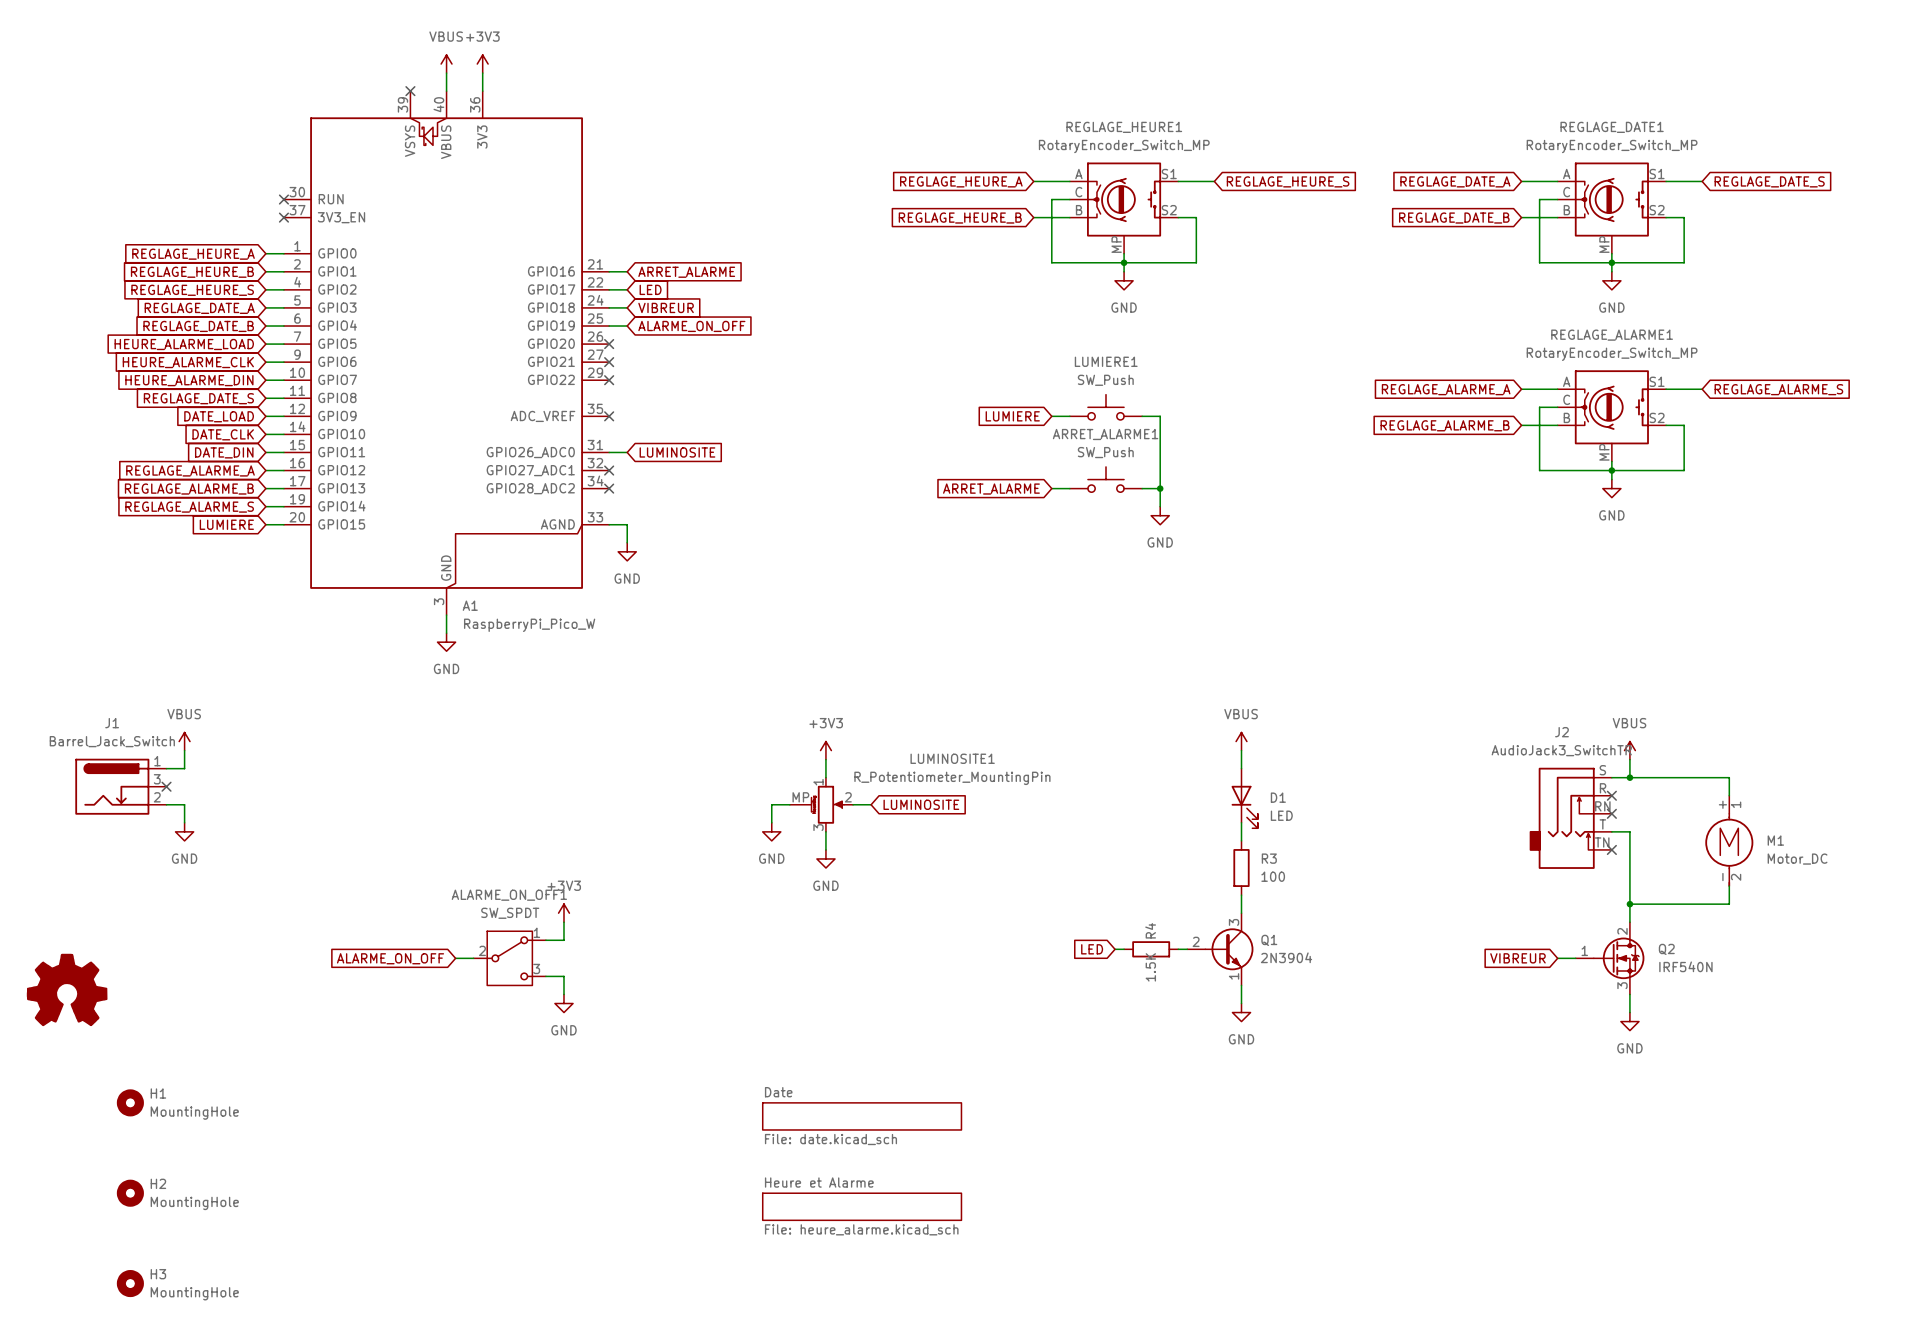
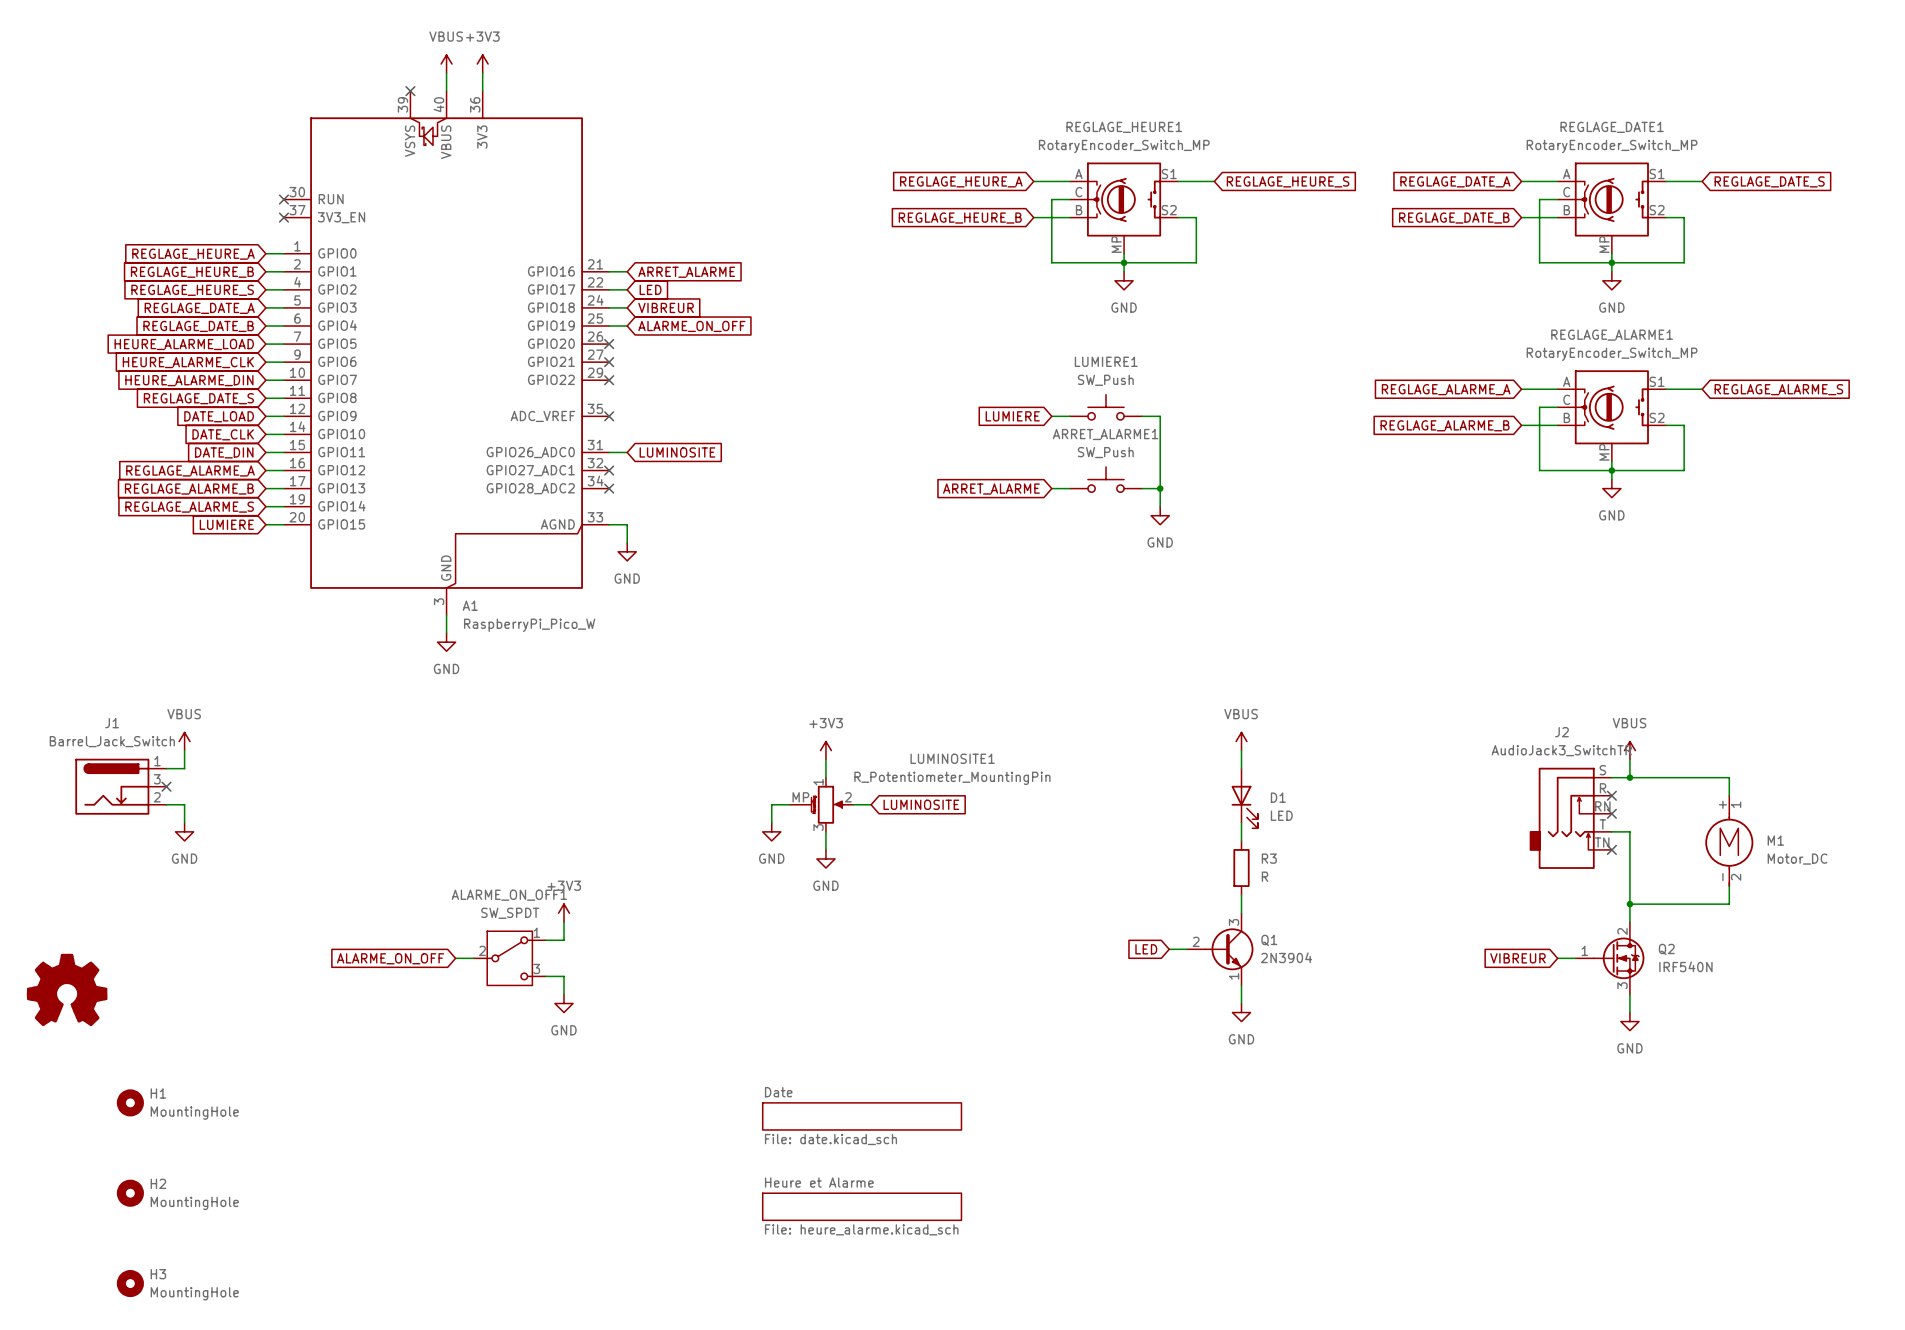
R3 value: 100 (1273, 876) -> R (1265, 876)
global label position: LED (1092, 949) -> LED (1146, 949)
R4: 1.5K (1151, 949) -> none

